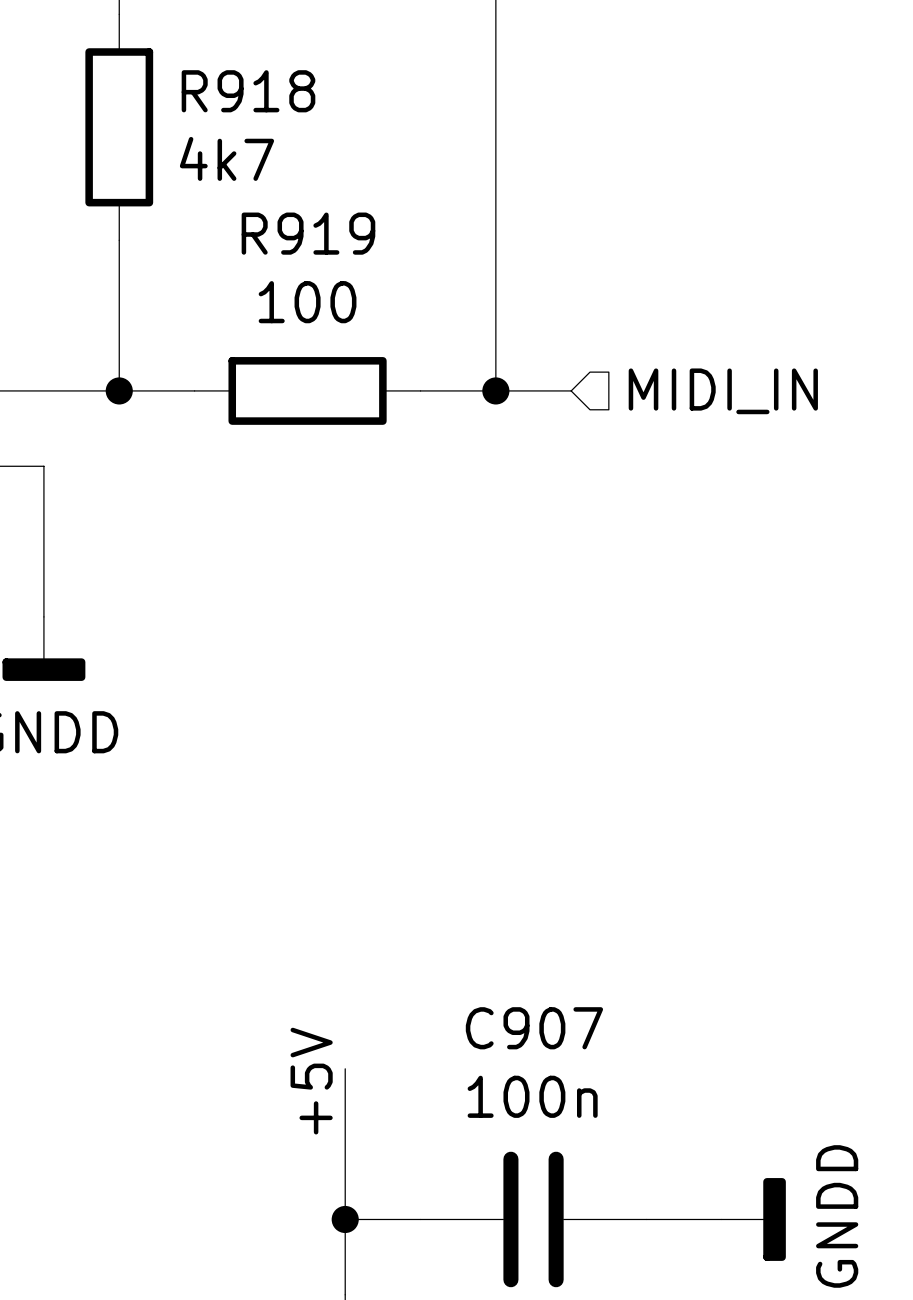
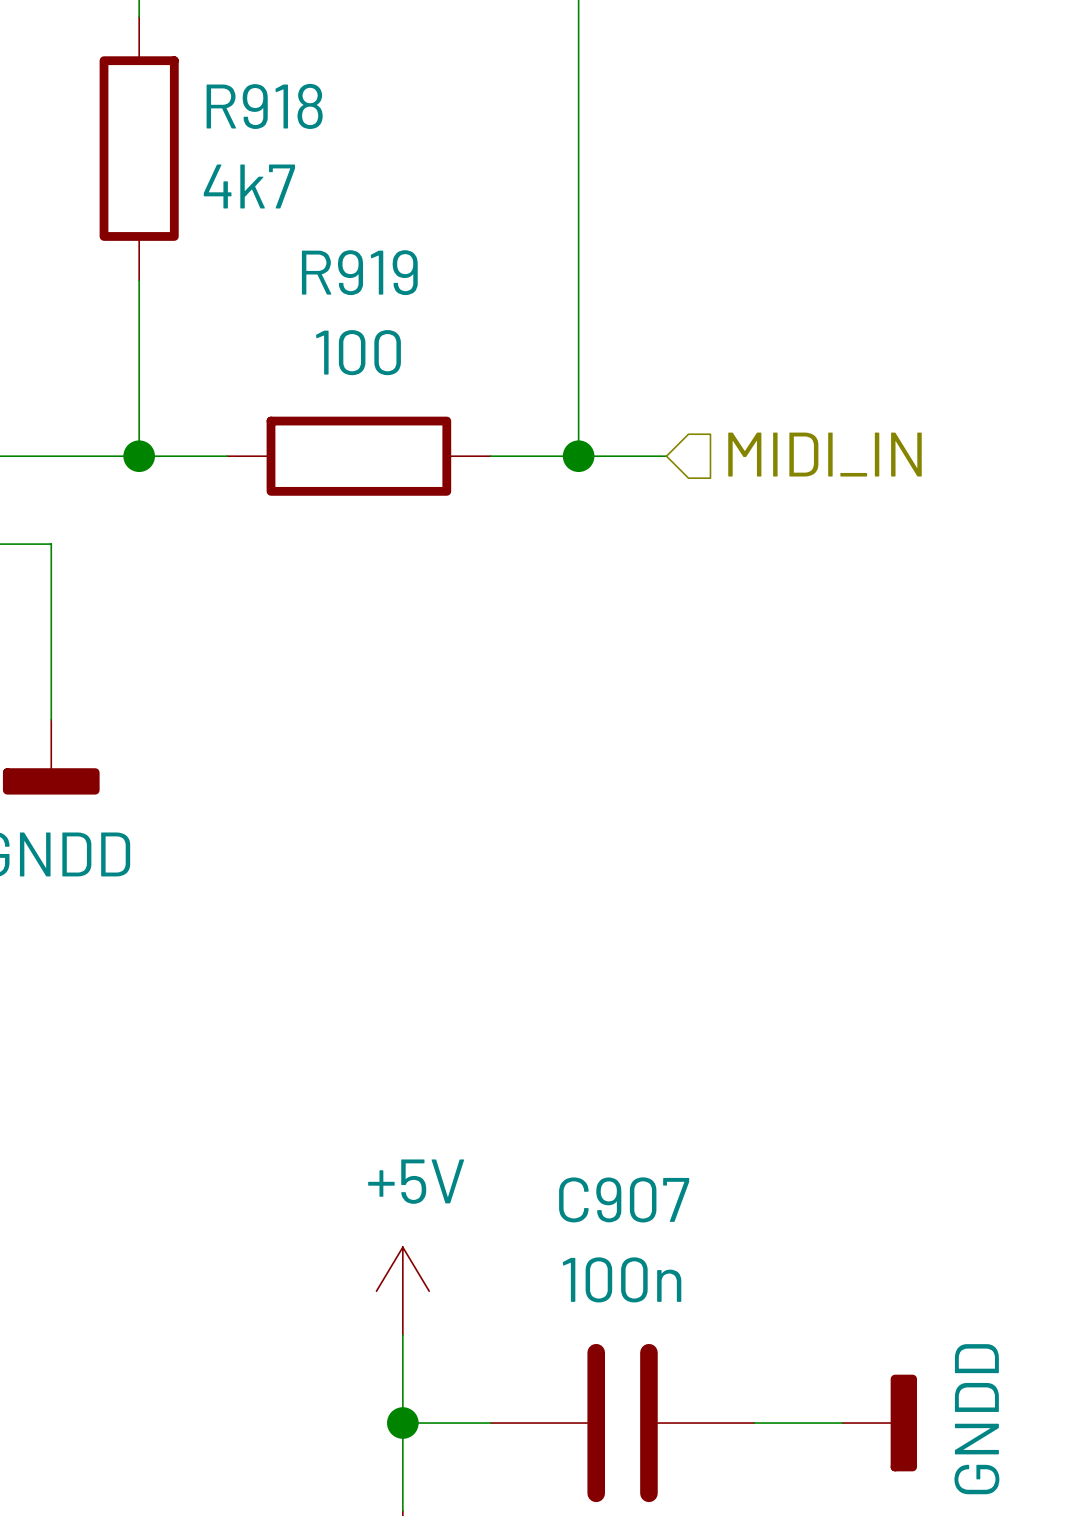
label: +5V (311, 1081) -> none
power symbol: none -> +5V (402, 1291)

